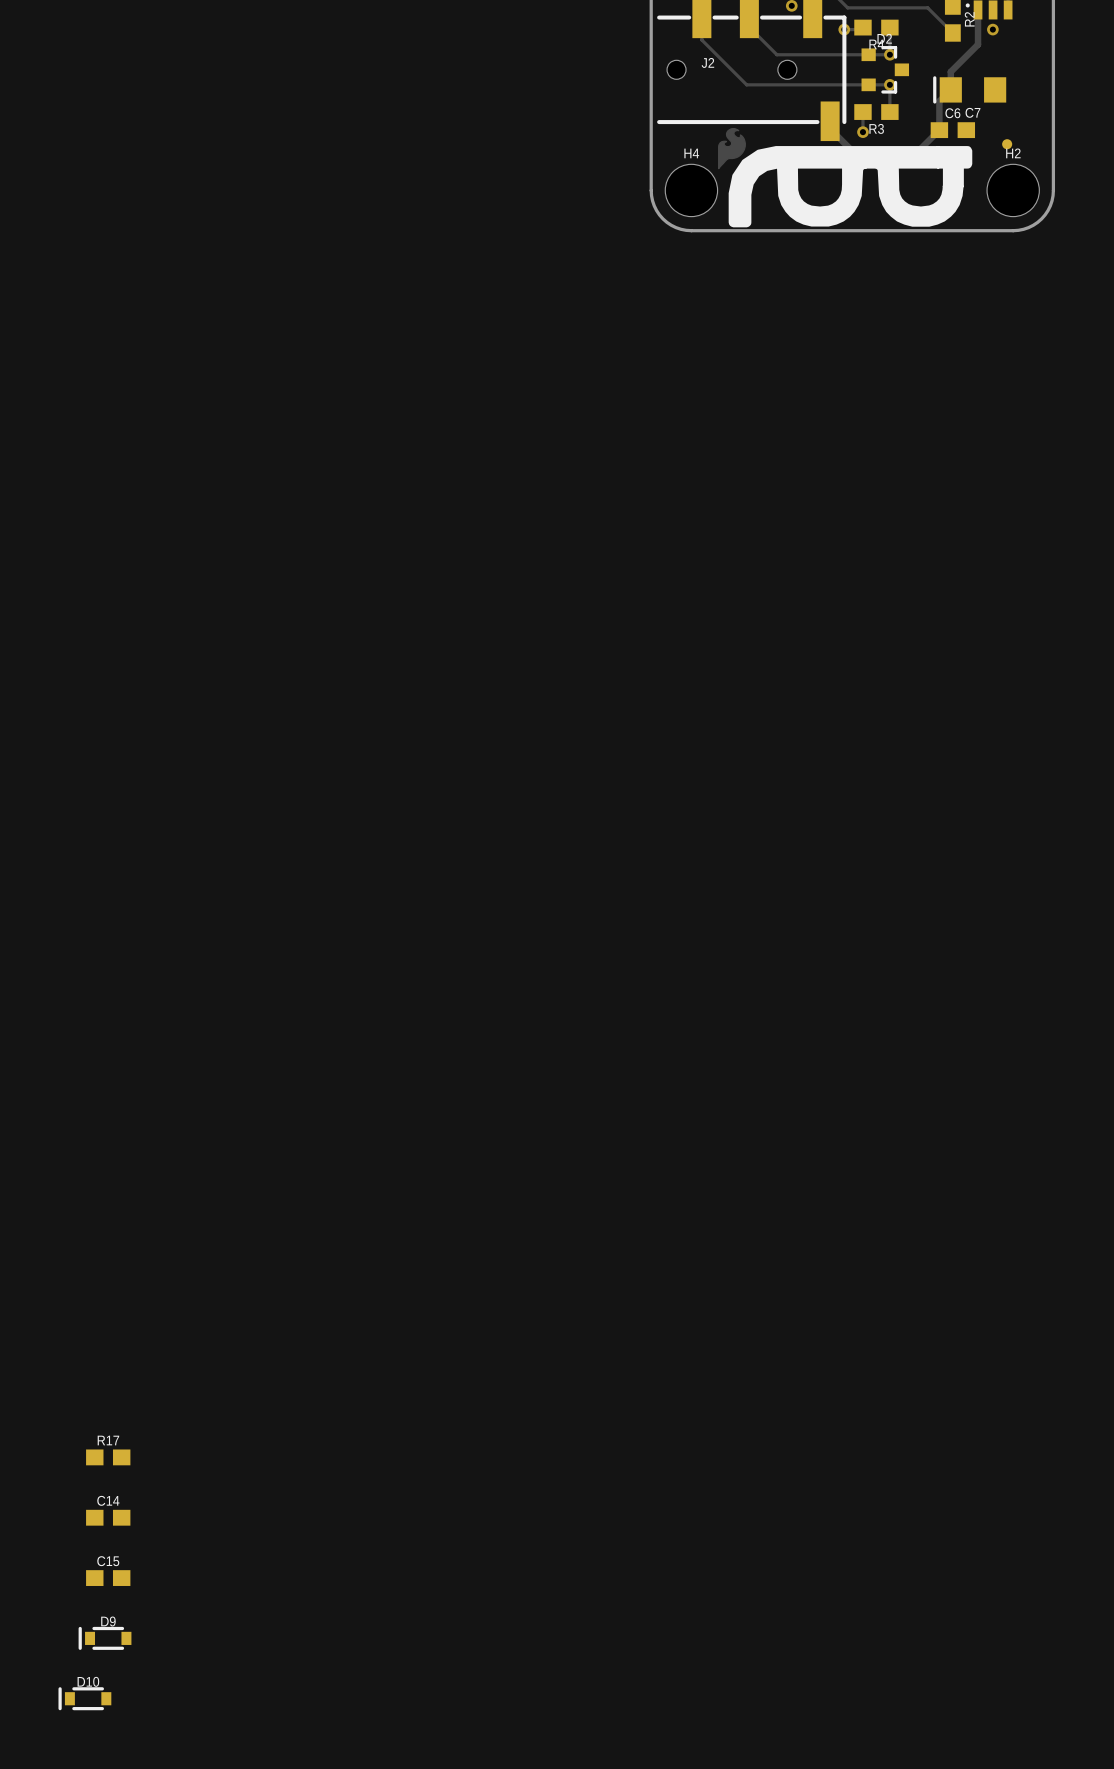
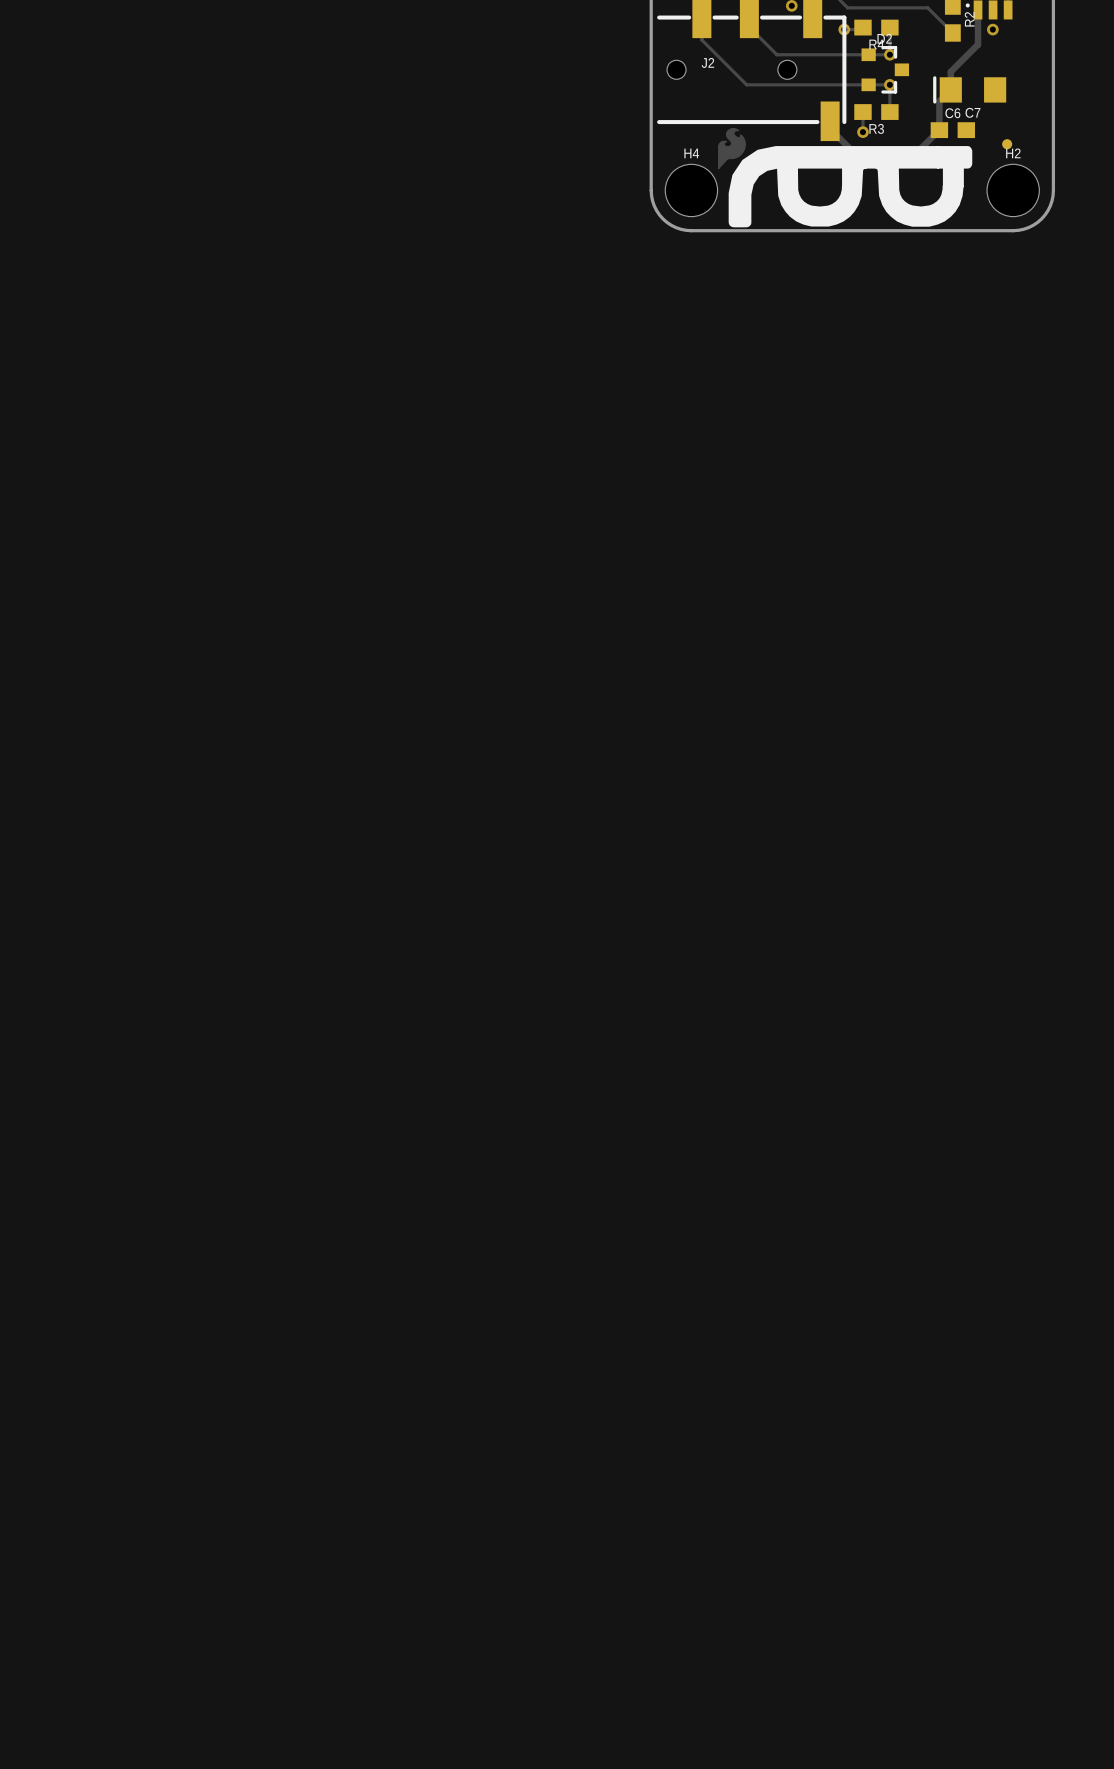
R17: (108, 1457) -> none
C14: (108, 1517) -> none
C15: (108, 1578) -> none
D9: (105, 1638) -> none
D10: (84, 1698) -> none

